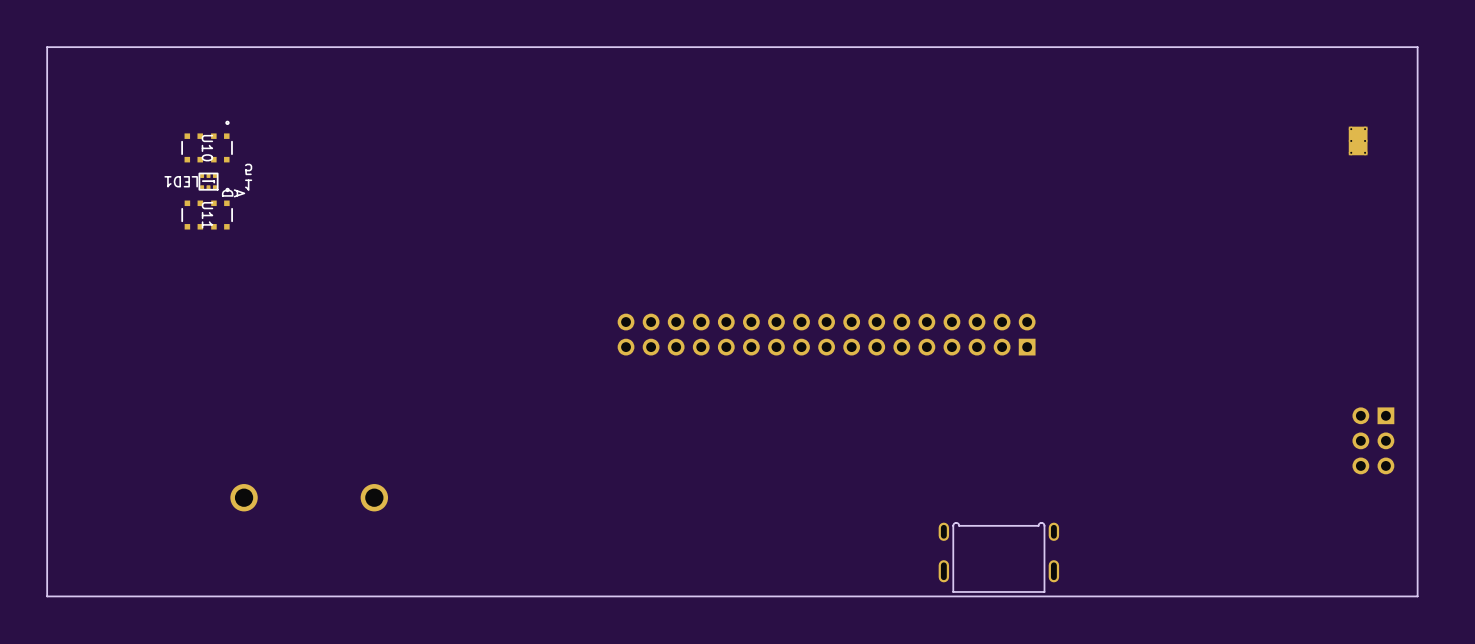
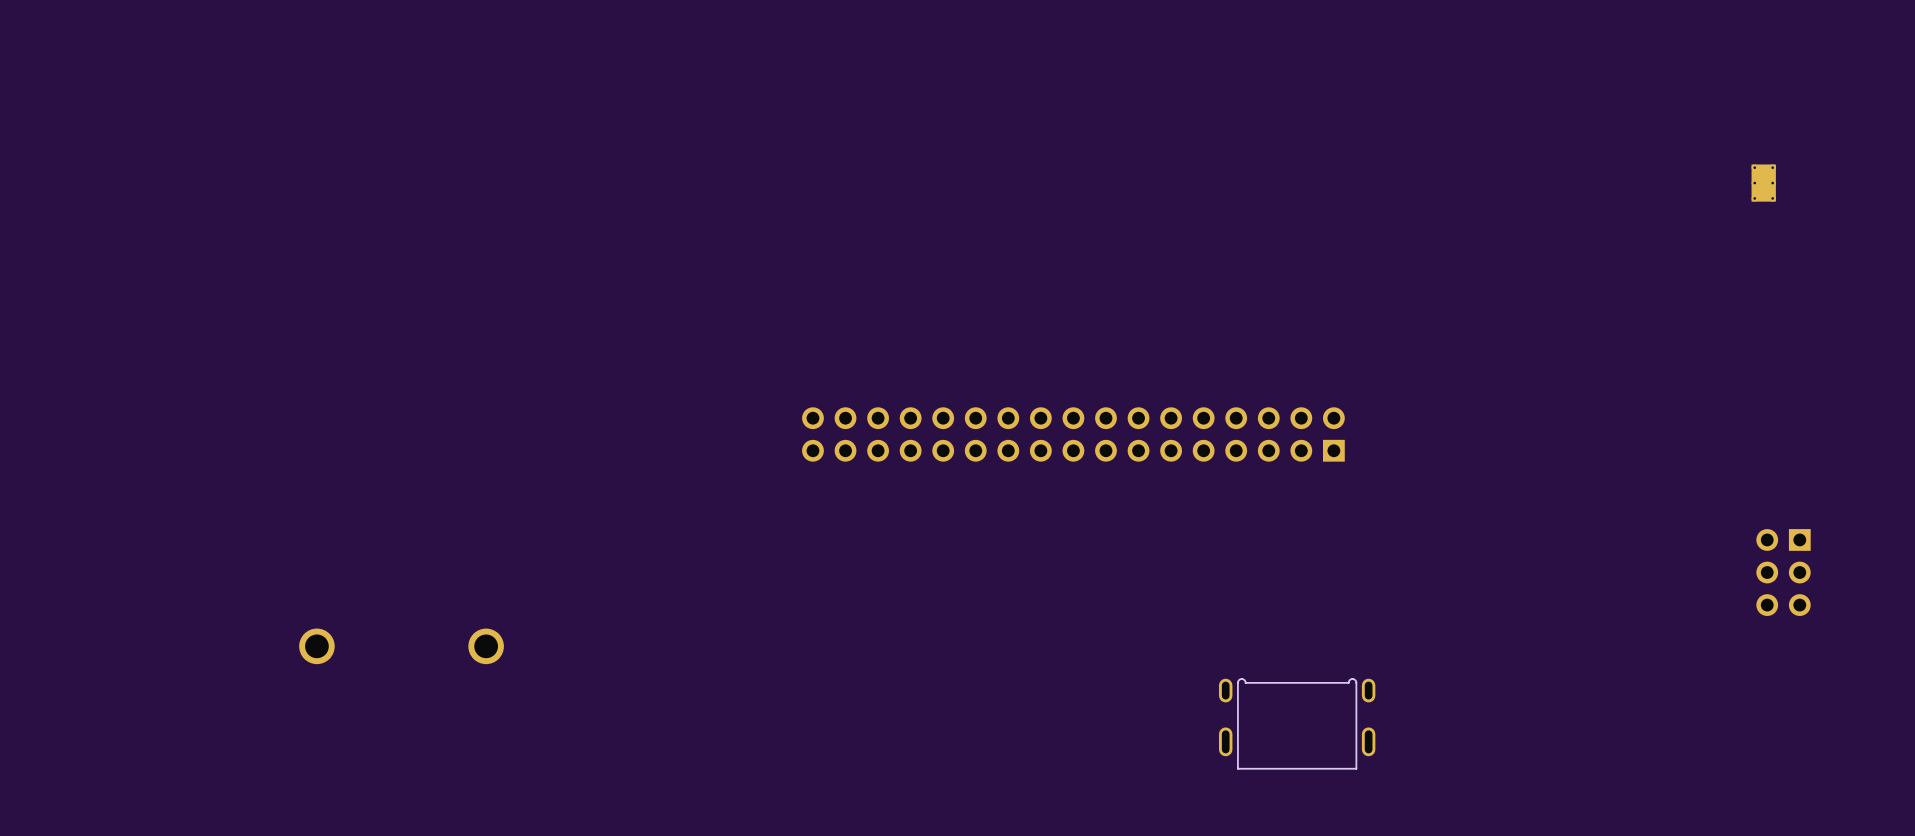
board edge: (1417, 47) (47, 47) (47, 596) (1417, 596) (1417, 47) -> none
U10: (207, 141) -> none
part: (237, 180) -> none
LED1: (208, 181) -> none
U11: (207, 208) -> none

